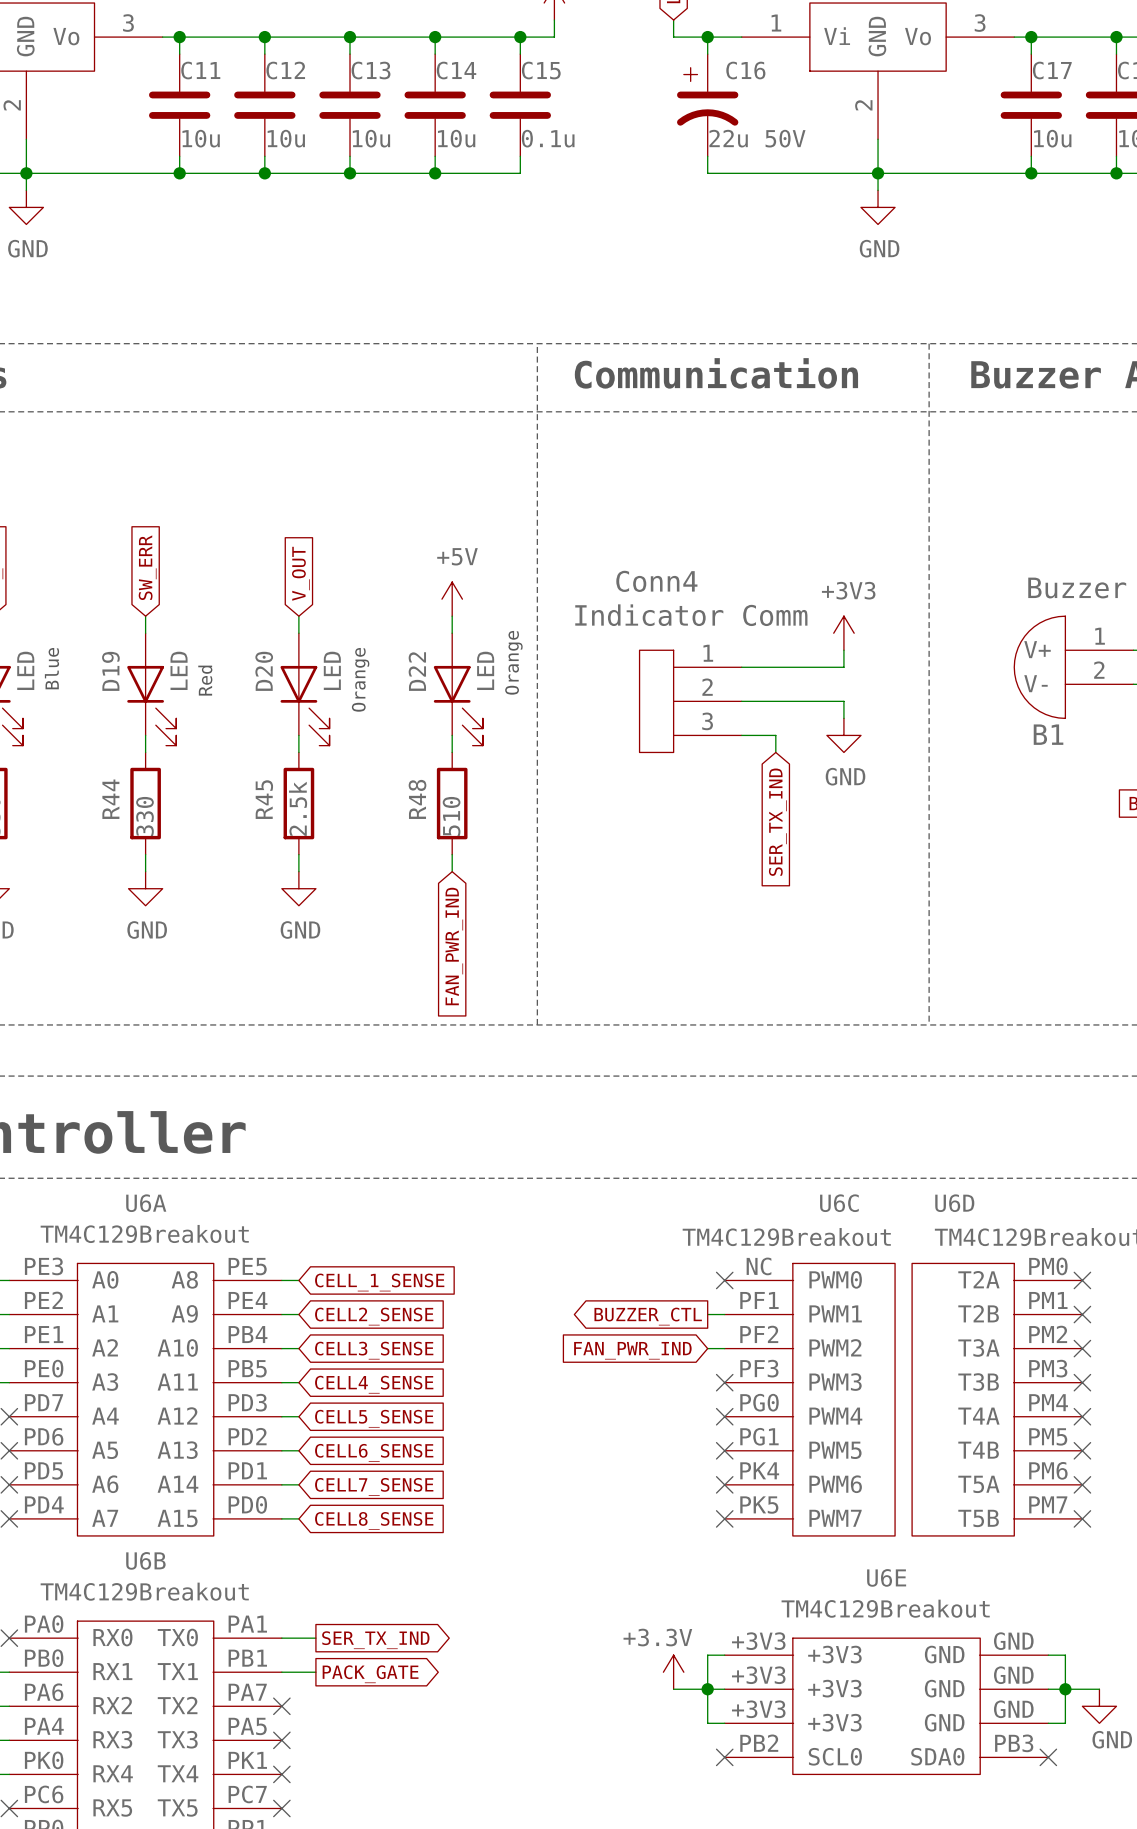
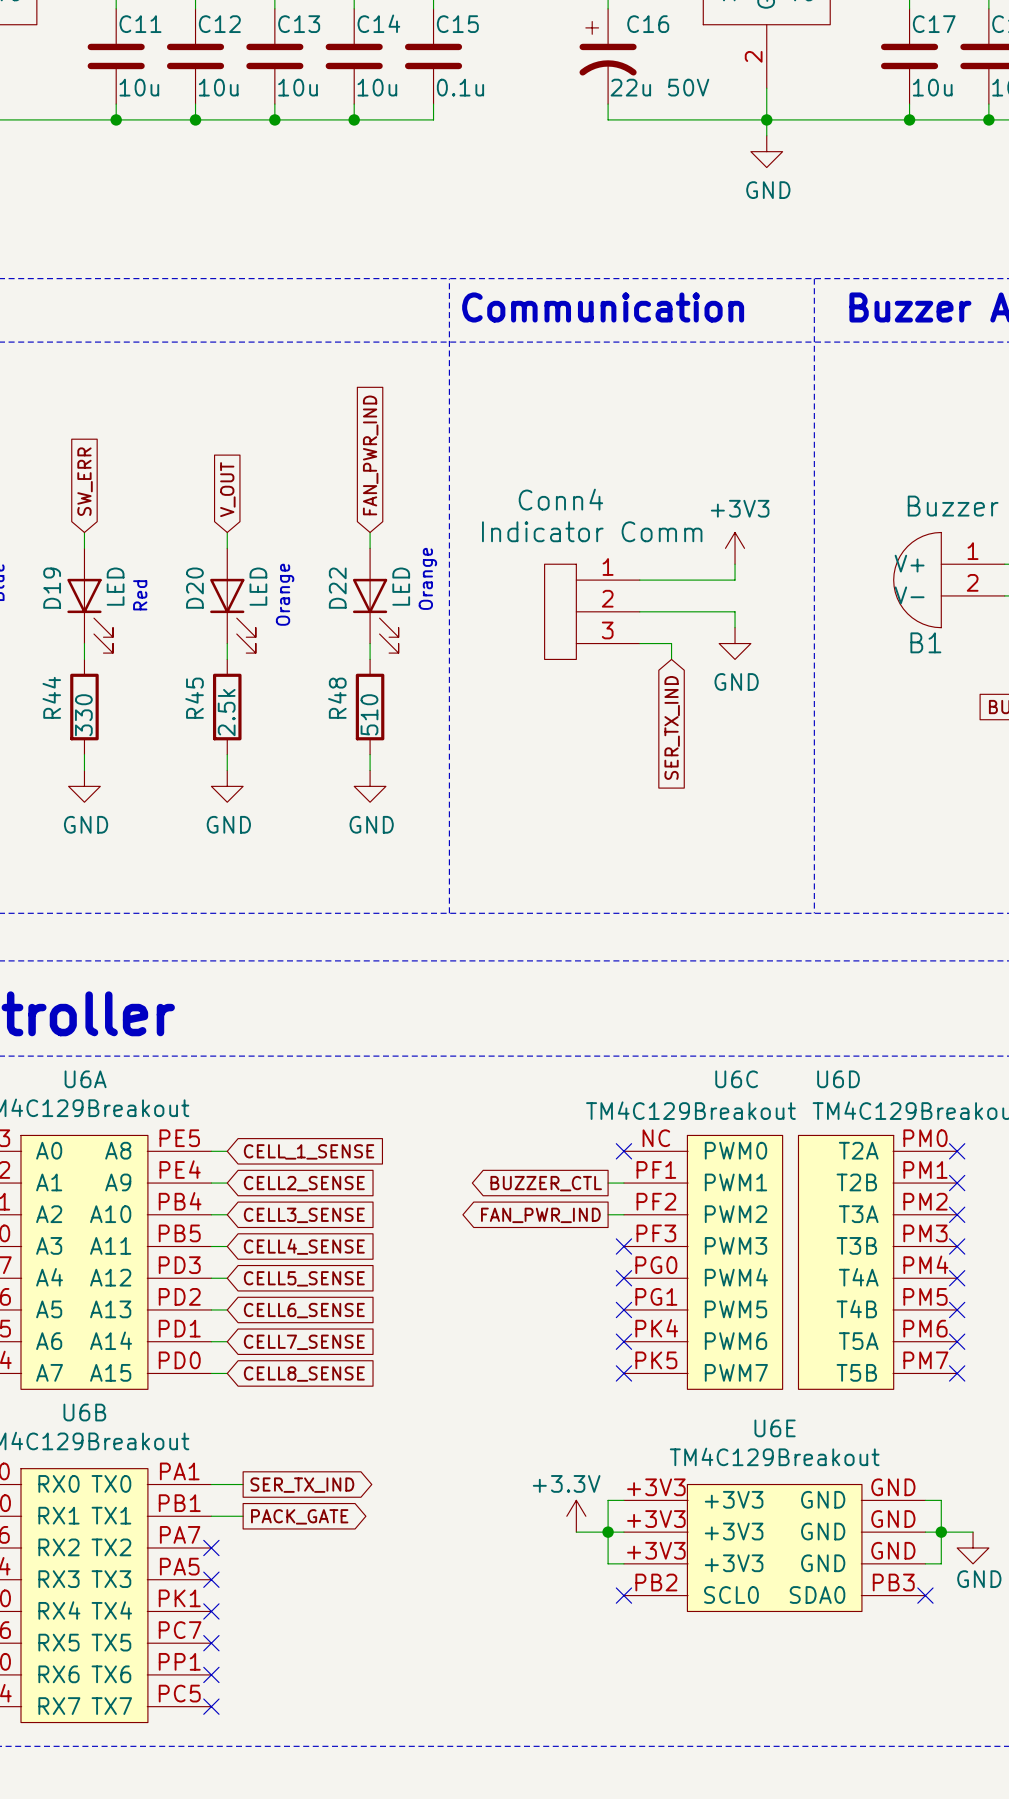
power symbol: +5V (452, 599) -> none
power symbol: none -> GND (370, 786)
global label rotation: 0° (454, 946) -> 180° (370, 455)
global label position: FAN_PWR_IND (454, 946) -> FAN_PWR_IND (370, 455)
global label shape: input (632, 1350) -> output (540, 1215)

